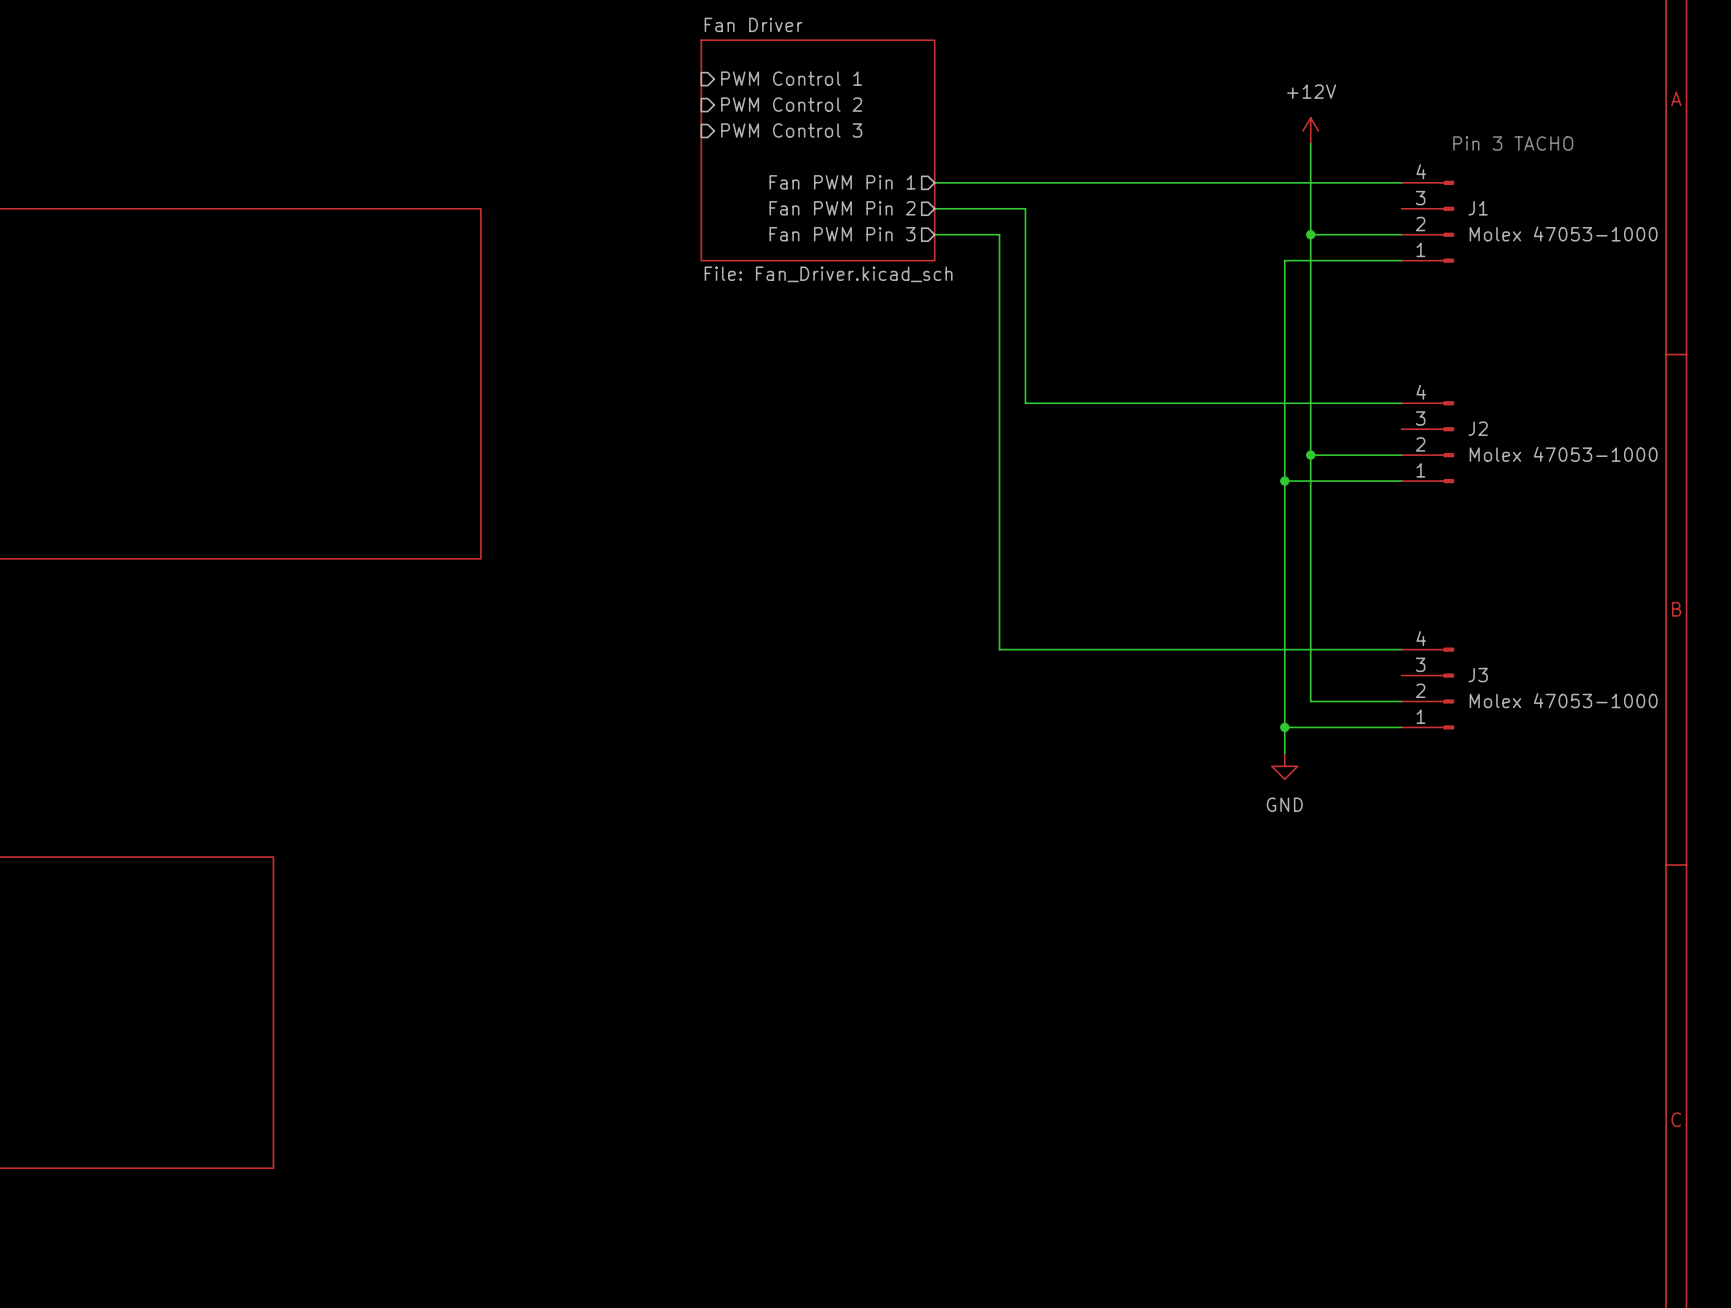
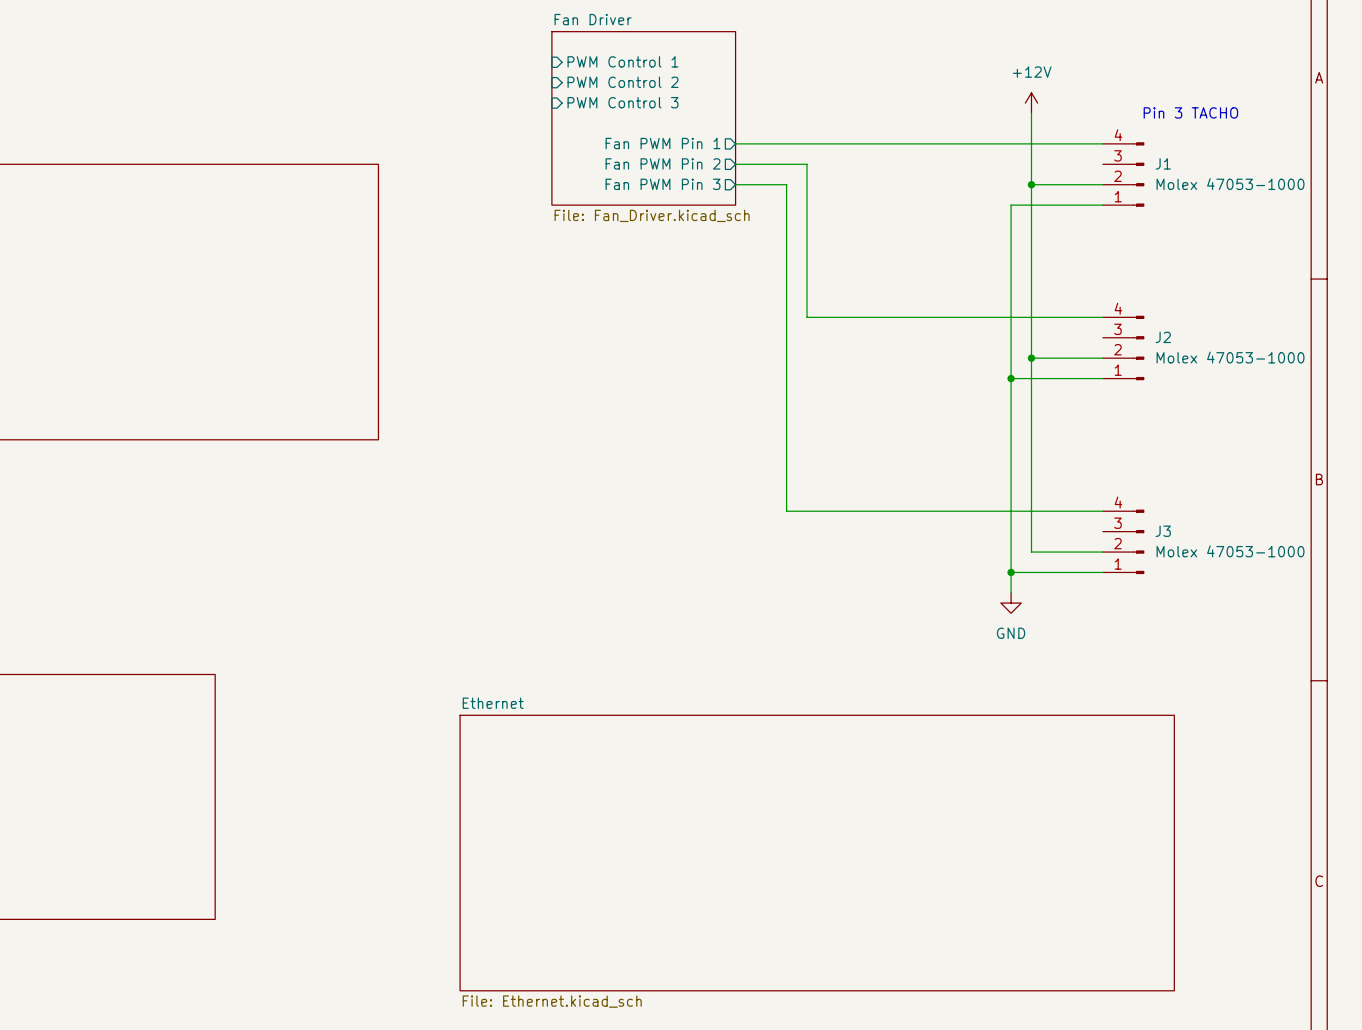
sheet Ethernet: none -> File: Ethernet.kicad_sch (817, 853)

